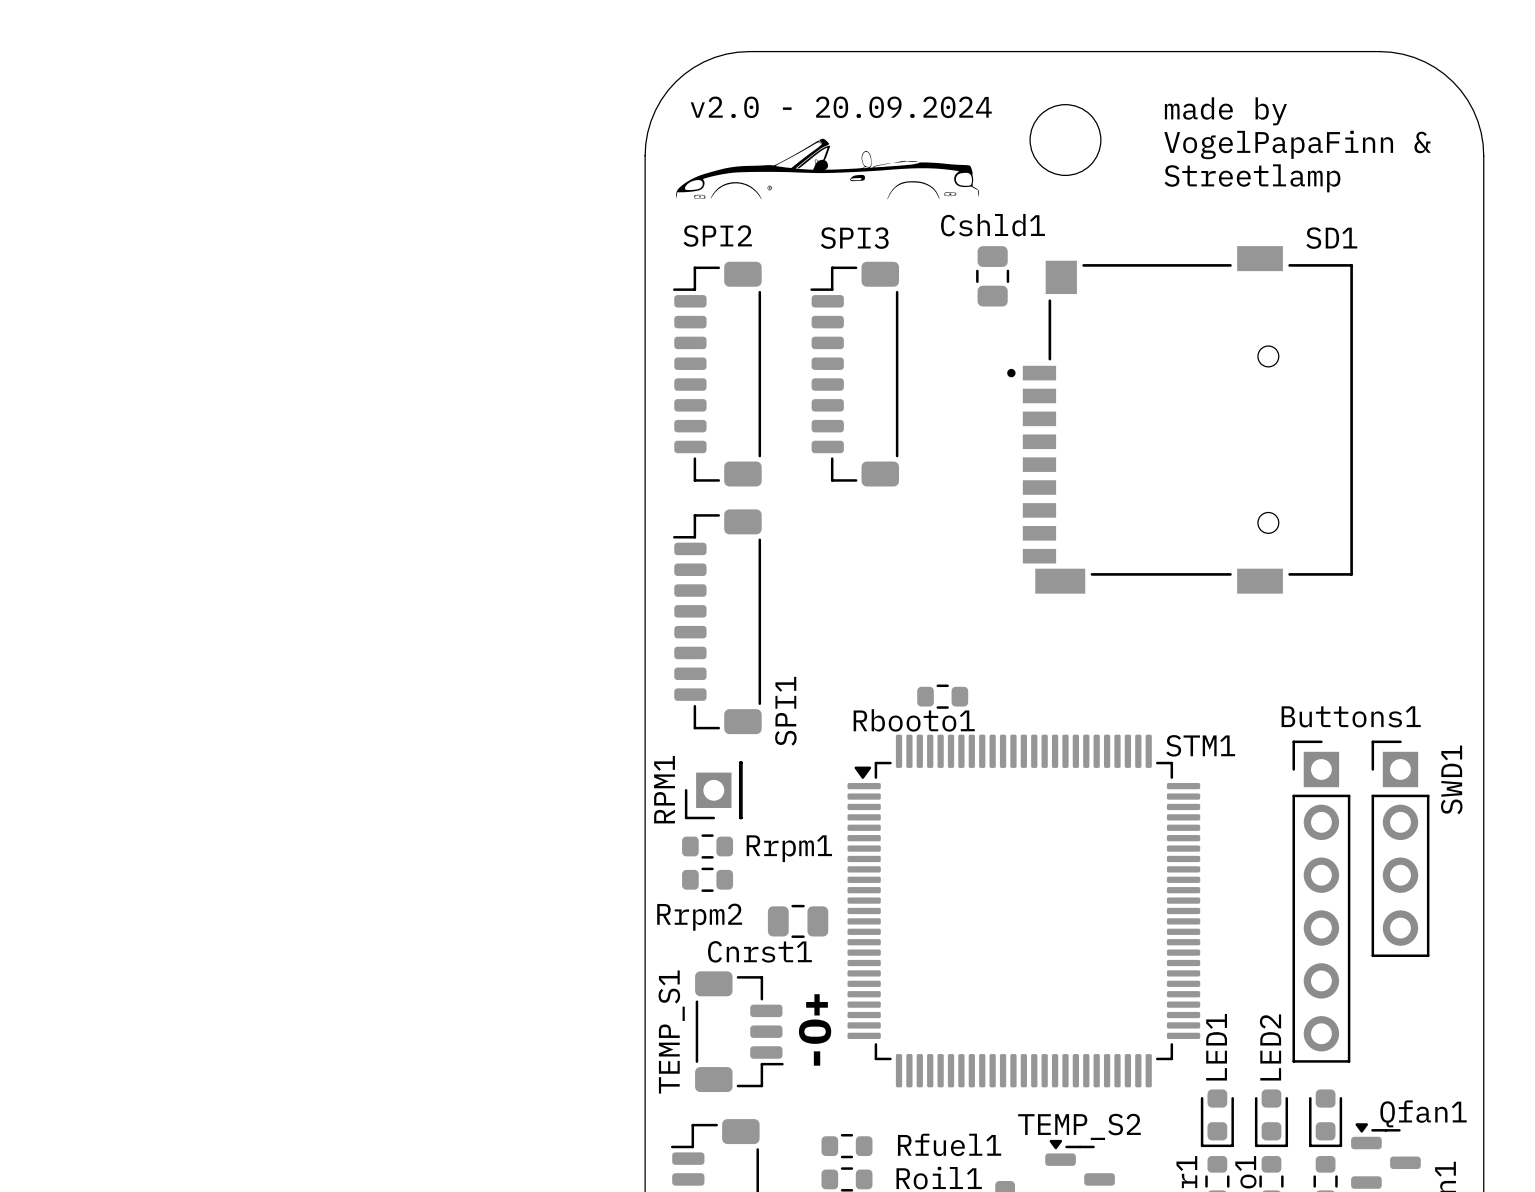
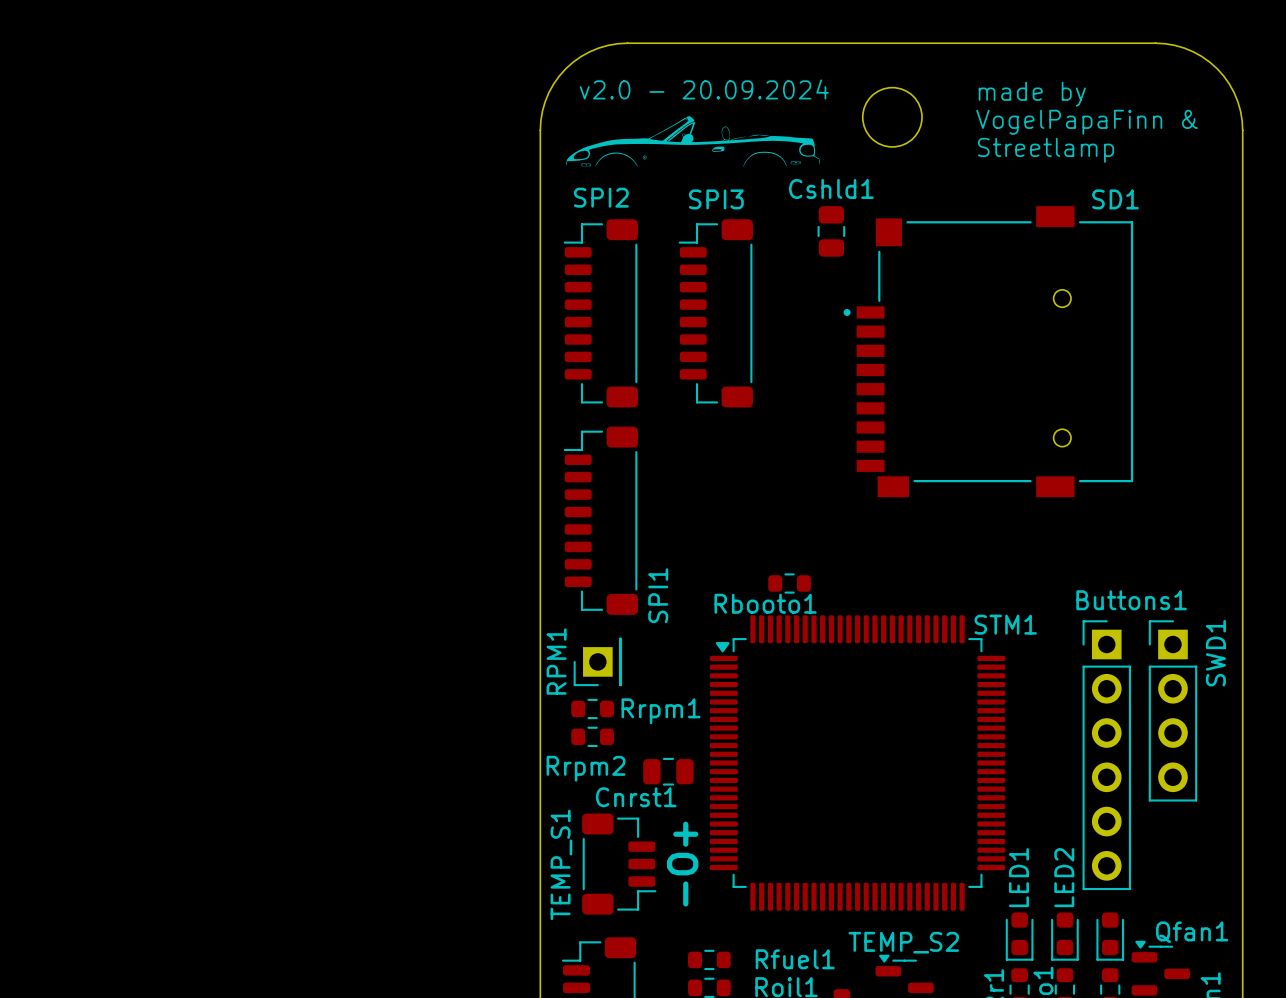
SD1 footprint: [1007, 246, 1353, 594] -> [843, 206, 1134, 498]

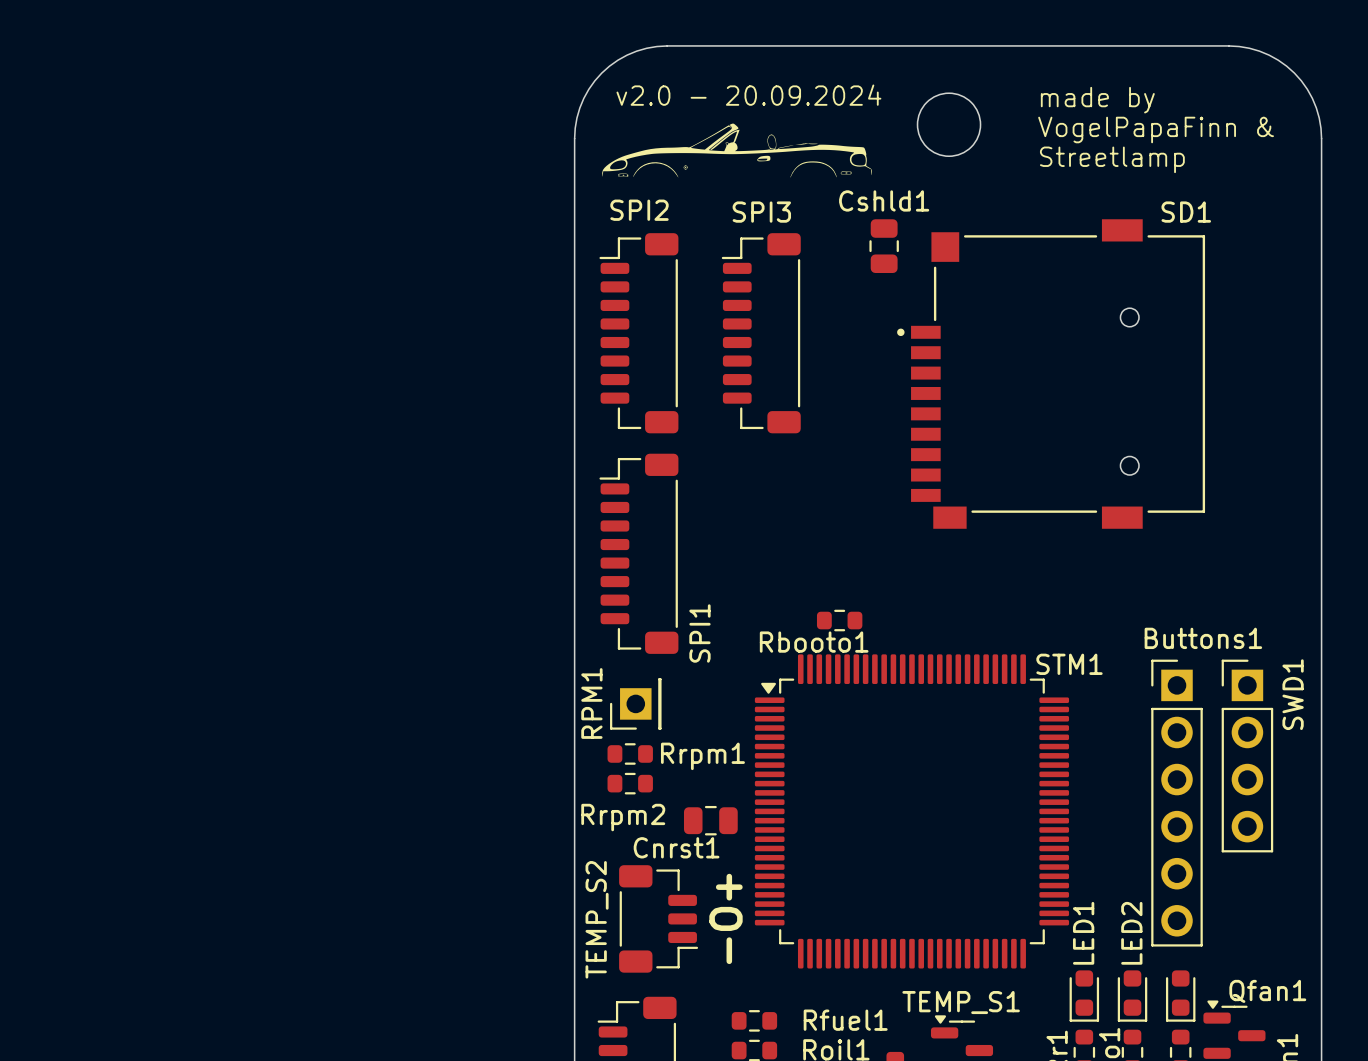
TEMP_S1 name: TEMP_S1 (561, 864) -> TEMP_S2 (597, 919)
TEMP_S2 name: TEMP_S2 (903, 942) -> TEMP_S1 (961, 1002)

